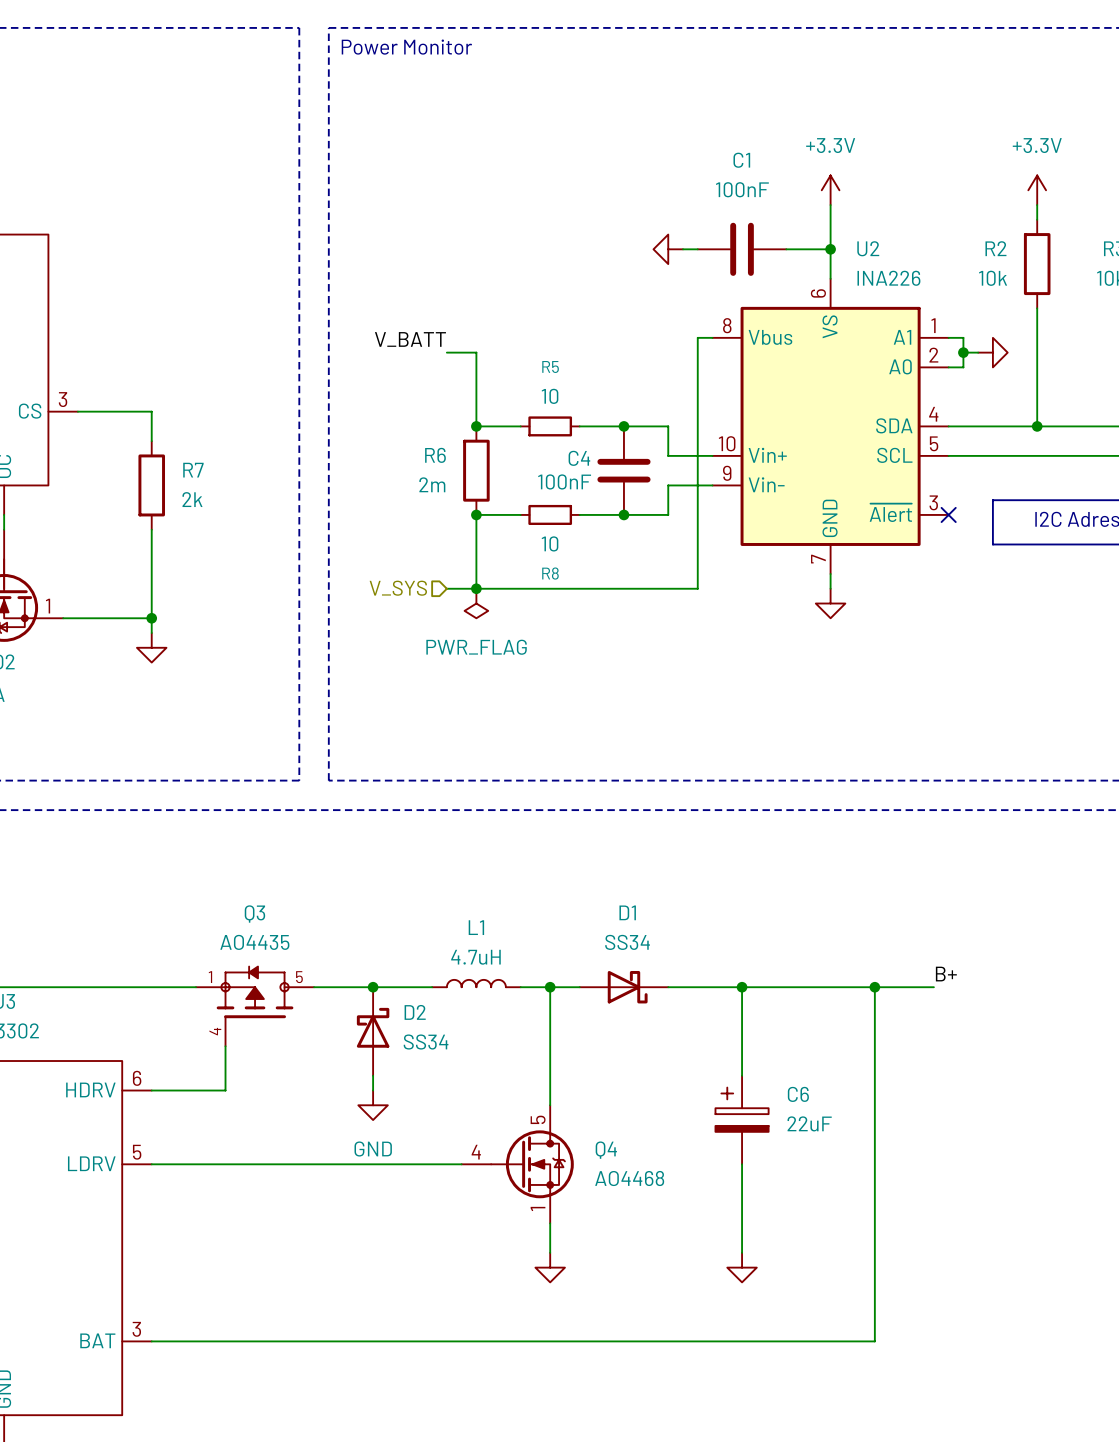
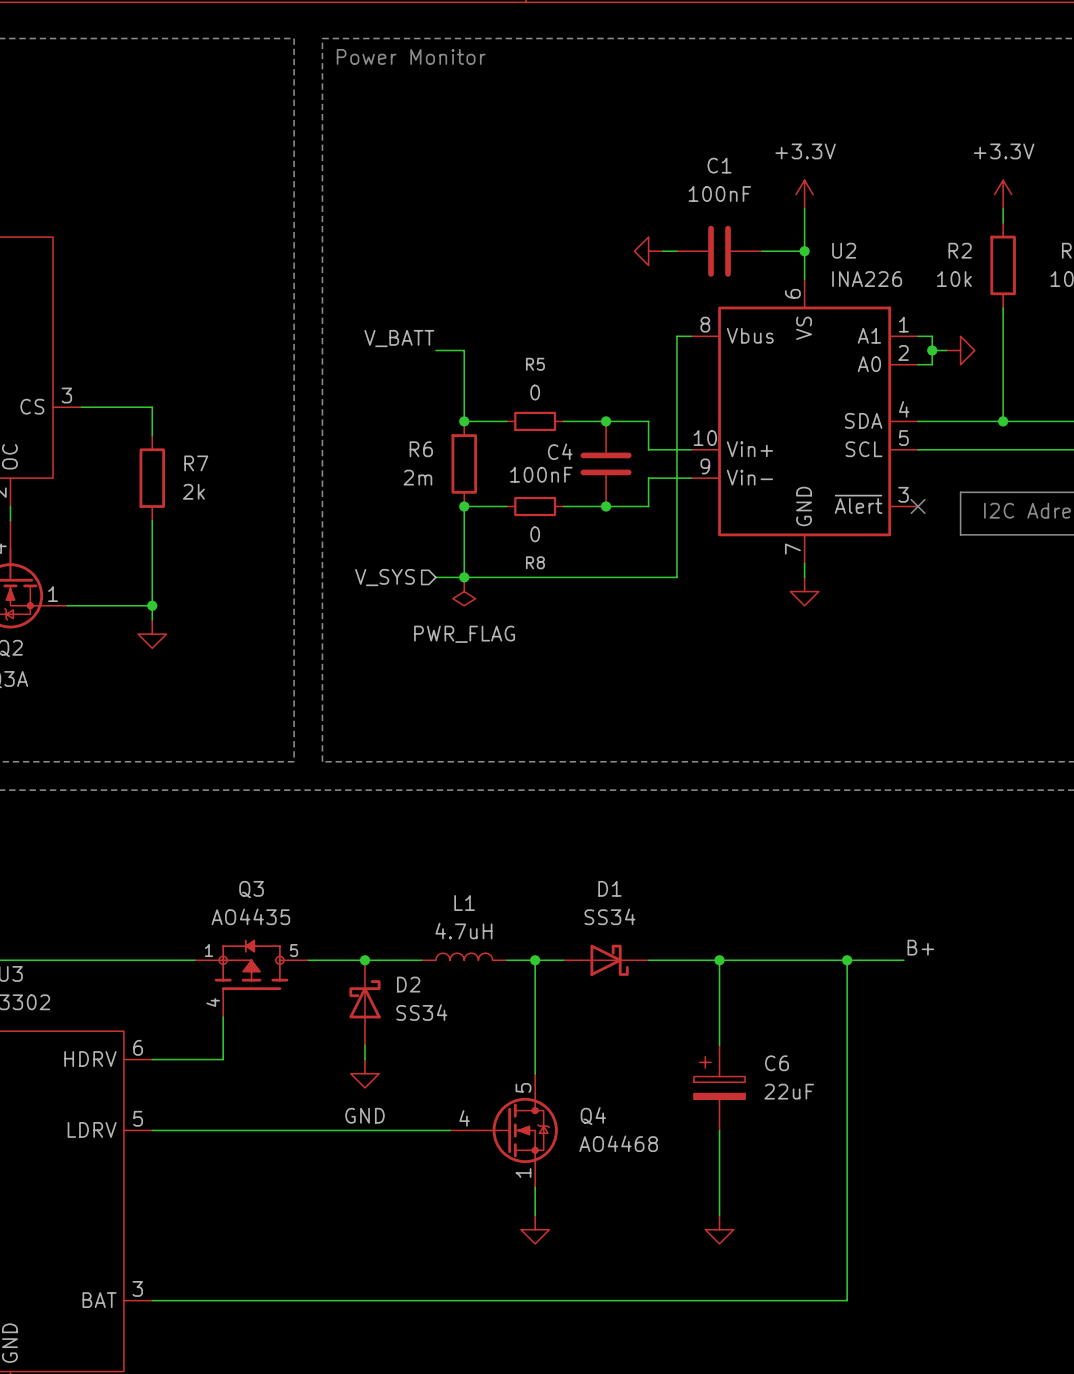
R5 value: 10 (550, 396) -> 0 (535, 392)
R8 value: 10 (550, 543) -> 0 (535, 534)

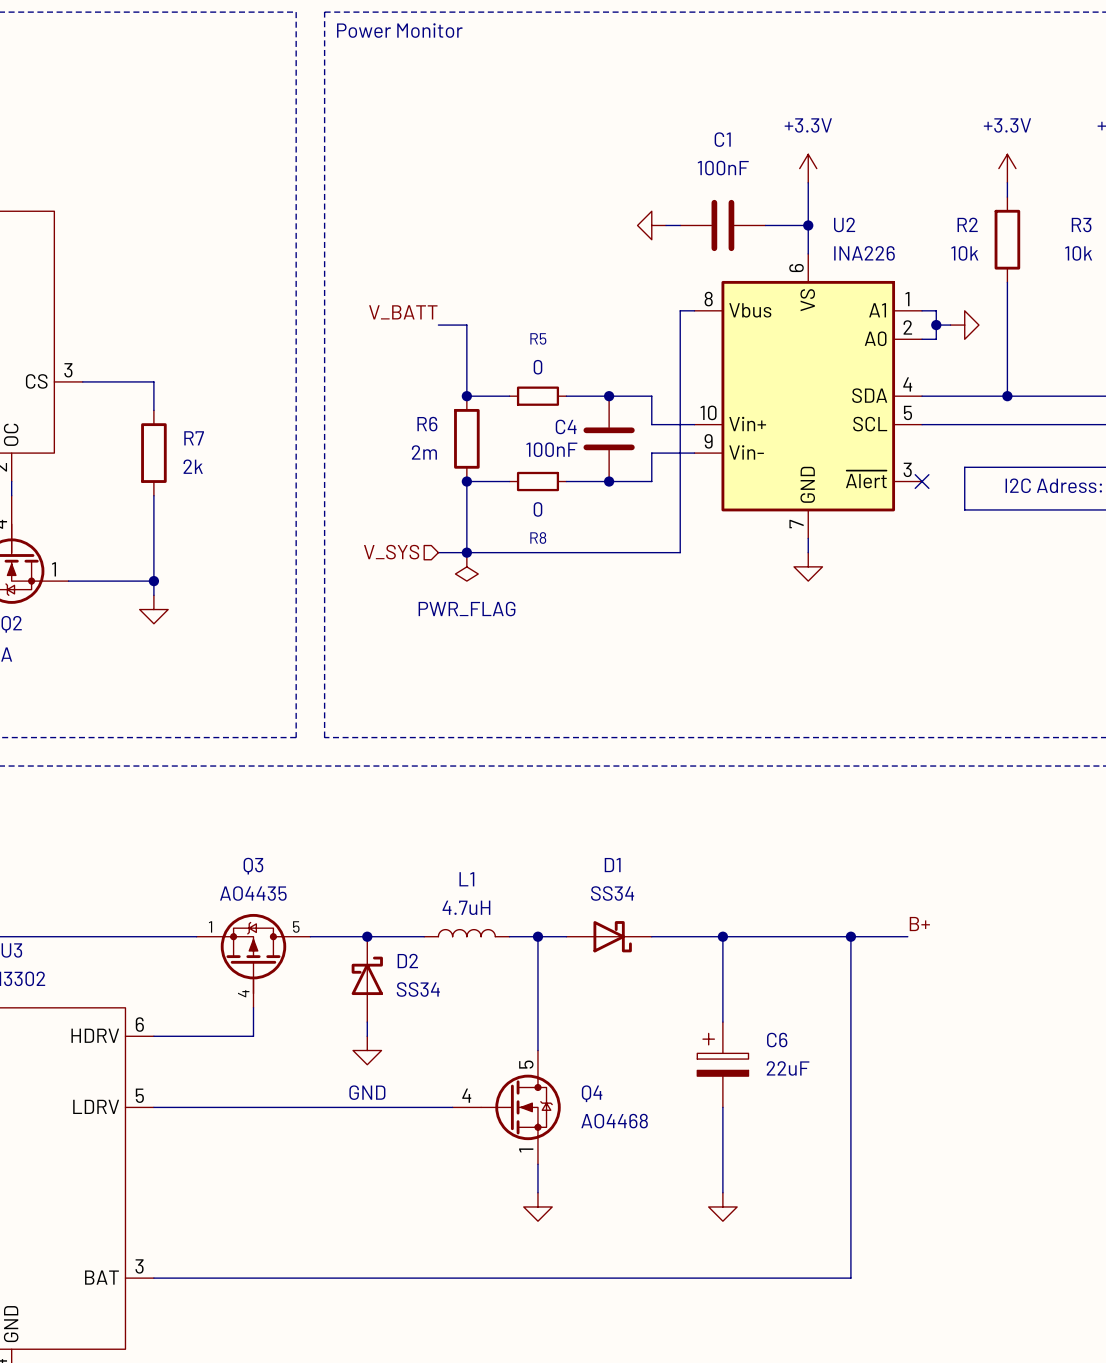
Q3 symbol: [194, 939, 309, 1018] -> [196, 913, 311, 1008]
wire: (223, 1017) (223, 1059) -> (253, 1007) (253, 1036) (225, 1036)

